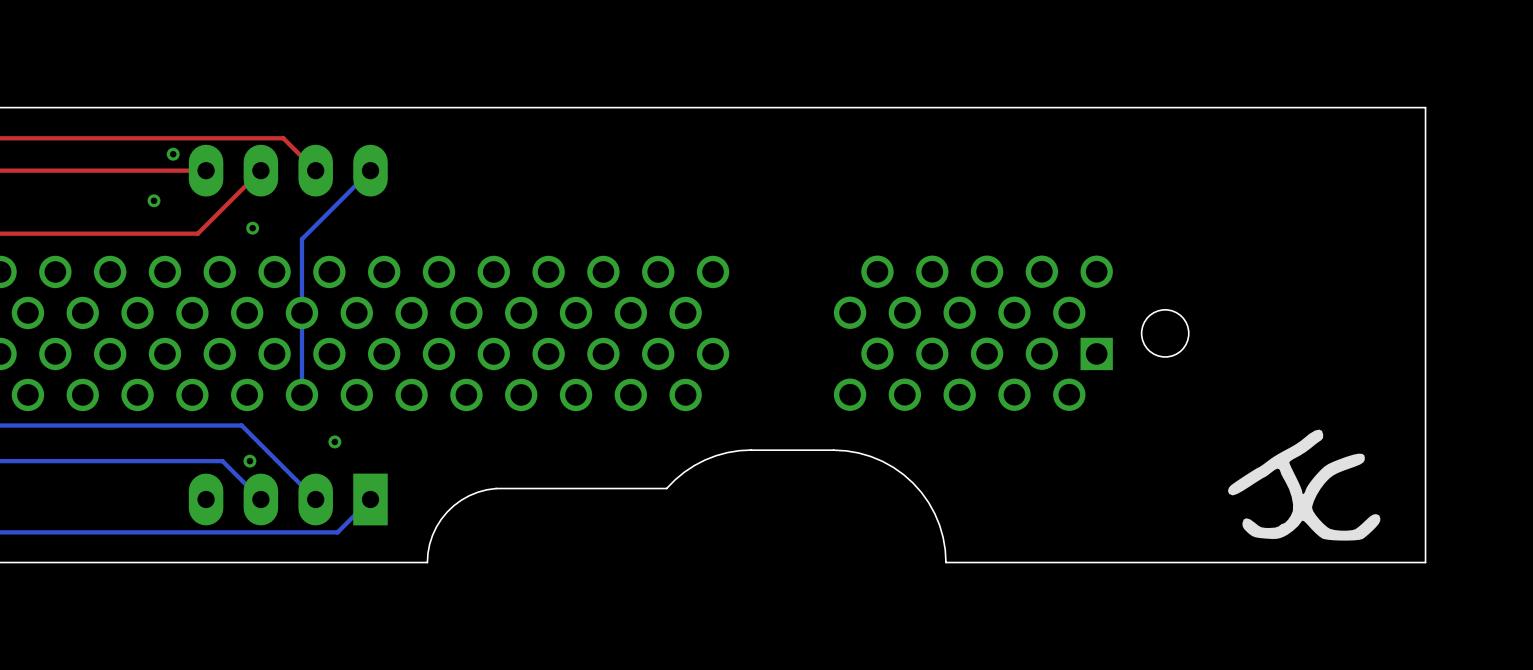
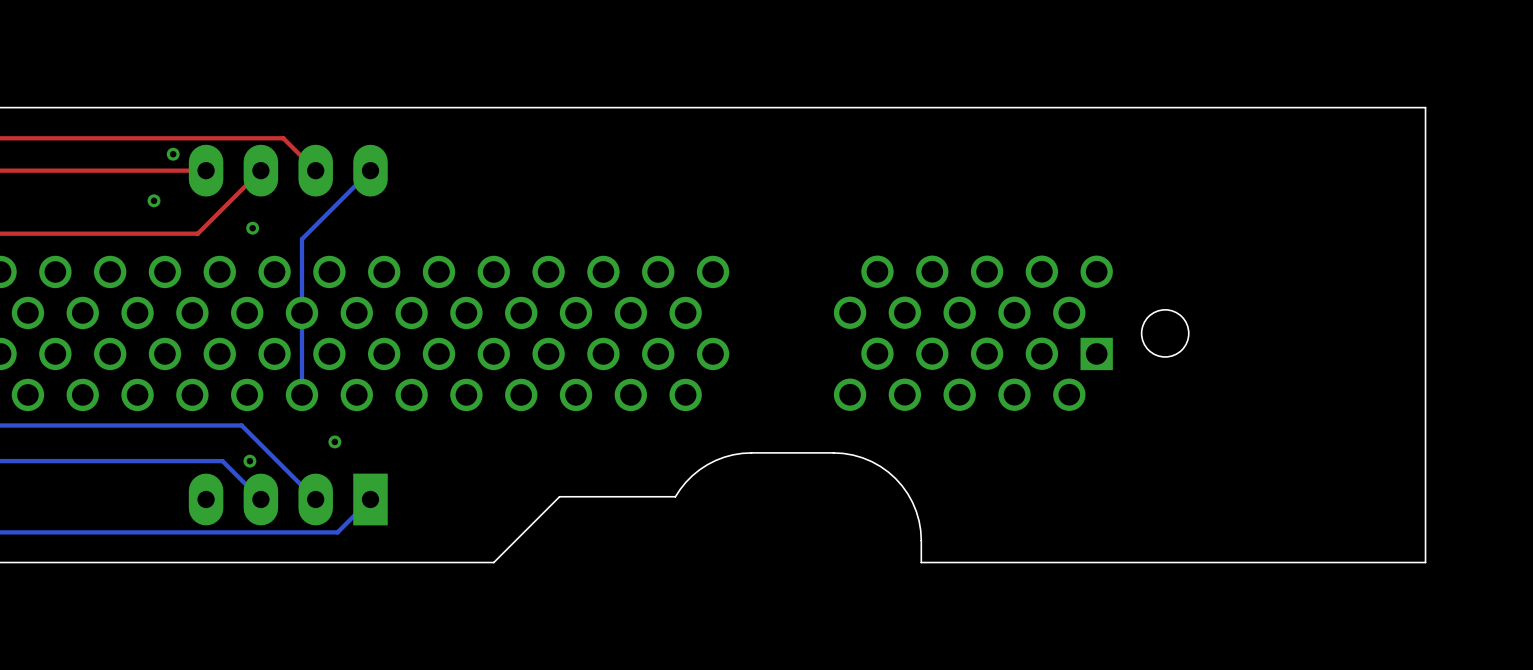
drawing: [1227, 429, 1381, 541] -> none
board edge: (751, 450) (846, 450) (870, 456) (893, 467) (913, 483) (934, 513) (943, 537) (945, 562) -> (675, 496) (686, 481) (699, 469) (715, 460) (733, 454) (751, 452) (833, 452) (853, 455) (880, 466) (895, 478) (907, 493) (919, 521) (921, 562) (945, 562)
board edge: (751, 450) (727, 452) (704, 460) (684, 472) (666, 488) (496, 488) (478, 492) (461, 500) (441, 519) (432, 535) (427, 562) -> (675, 496) (559, 496) (493, 562) (427, 562)

